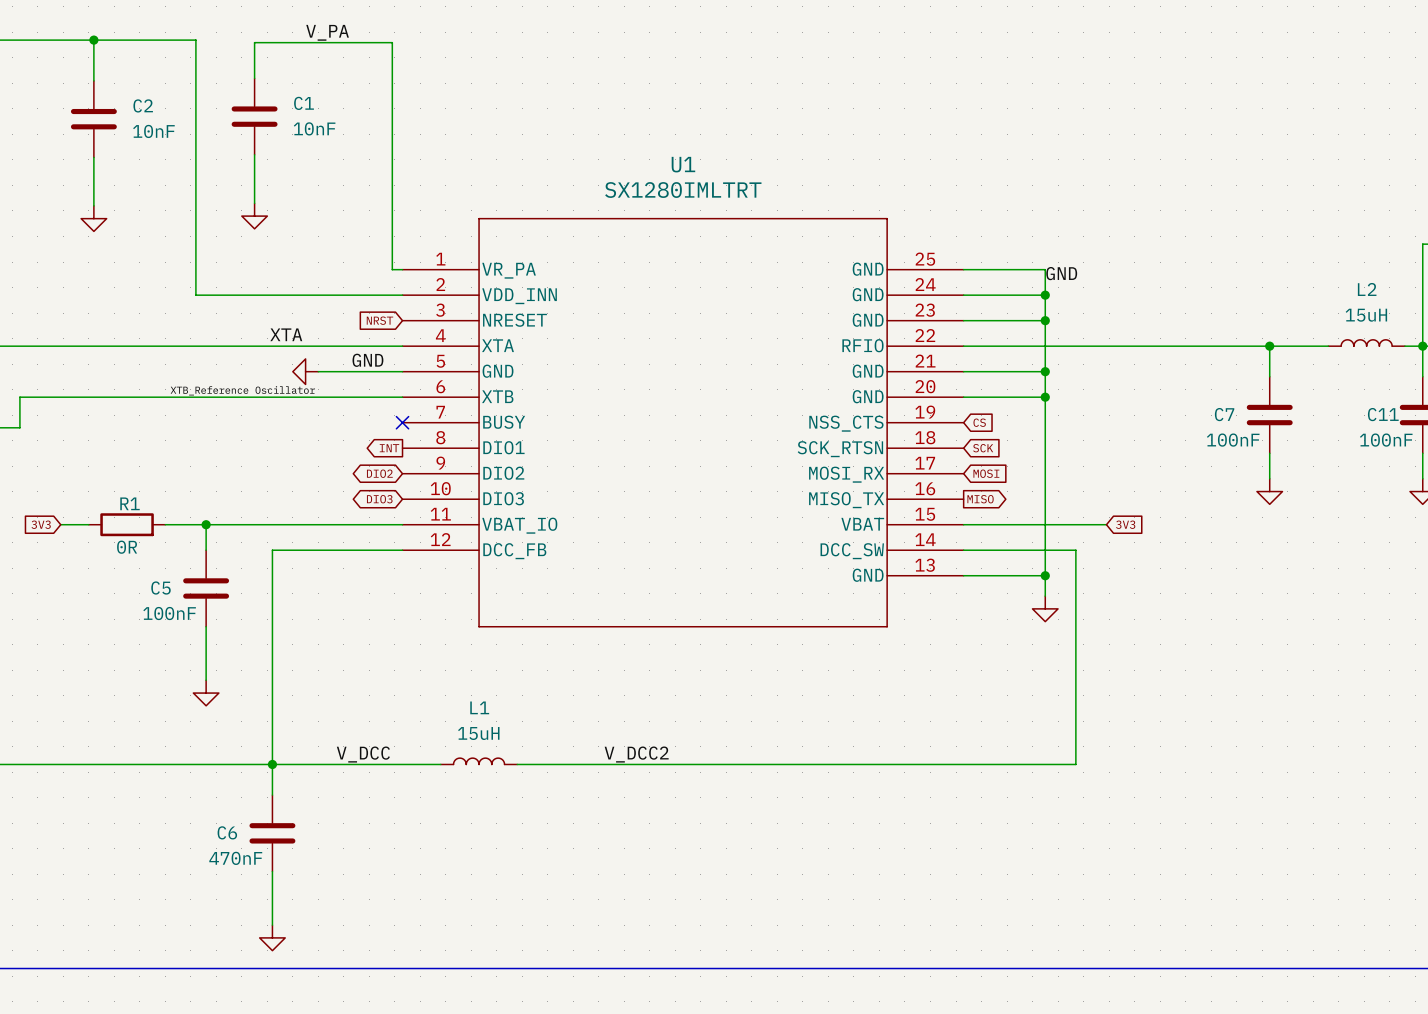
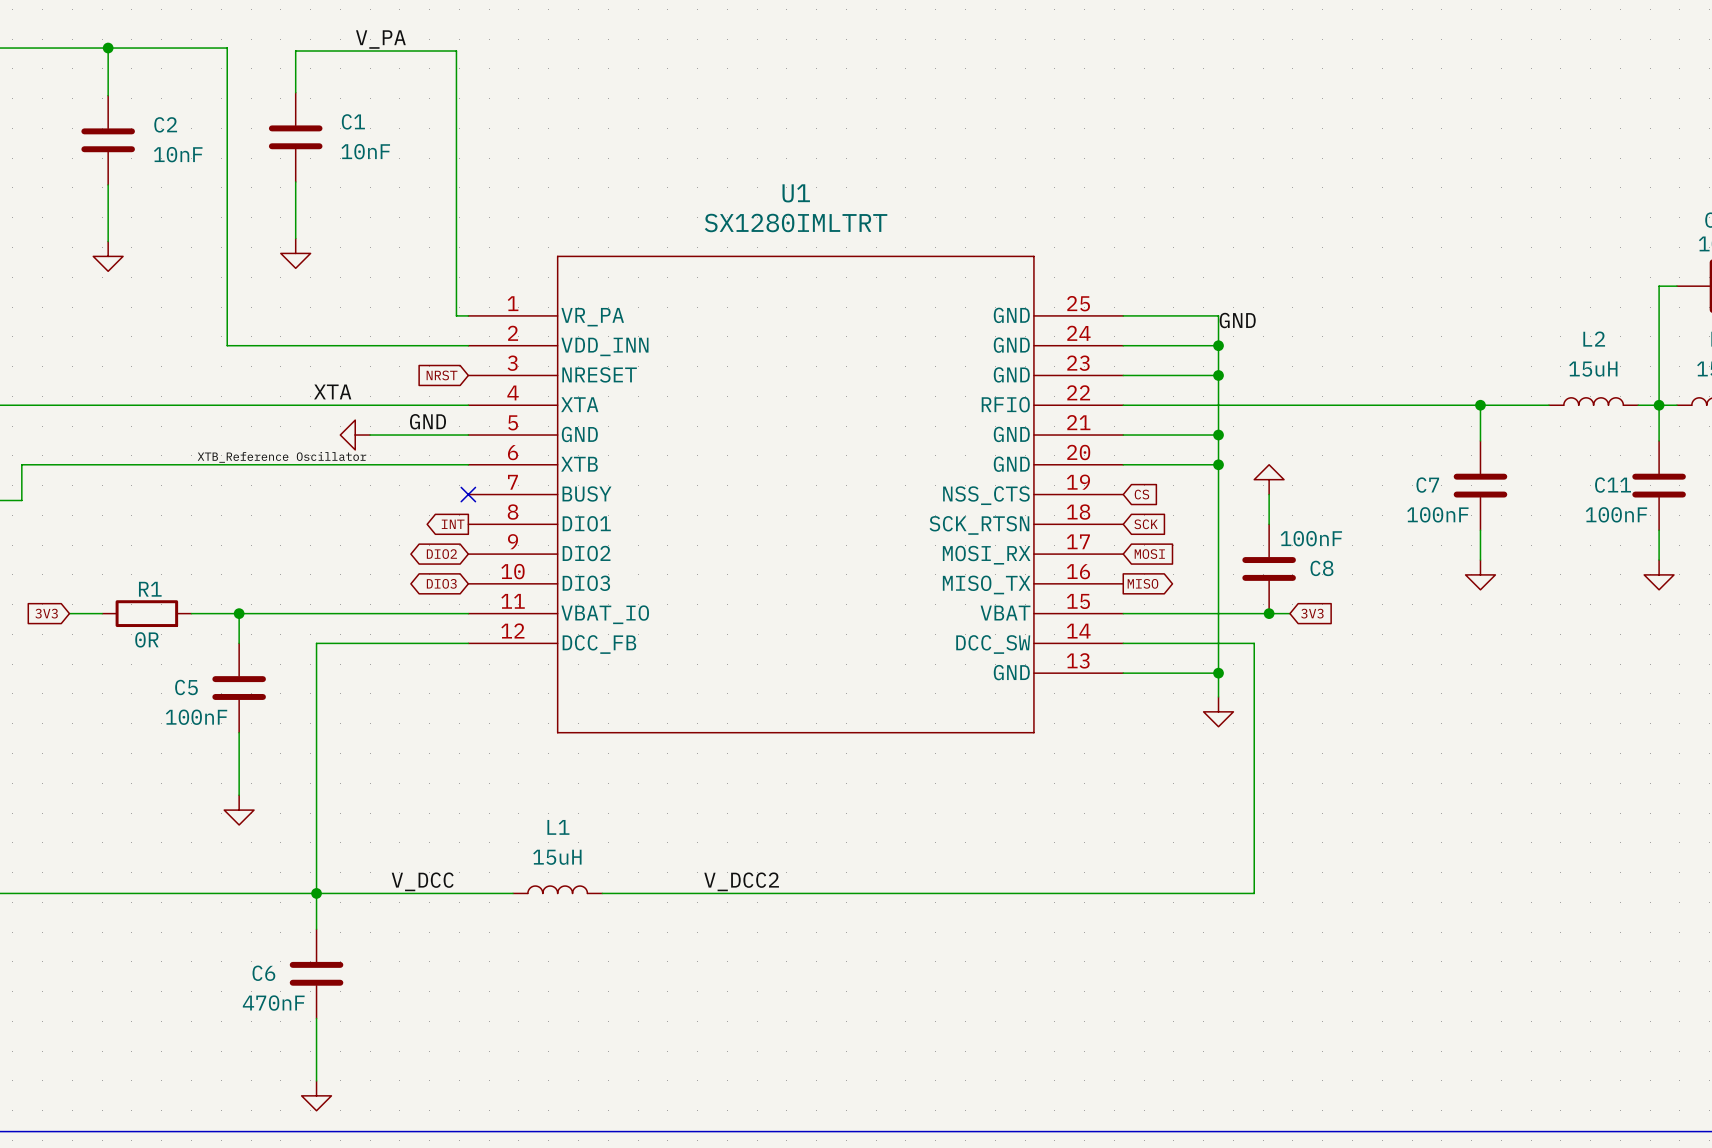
power symbol: none -> (1269, 479)
wire: none -> (1269, 494) (1269, 524)
C8: none -> 100nF (1269, 568)
junction: none -> (1269, 613)

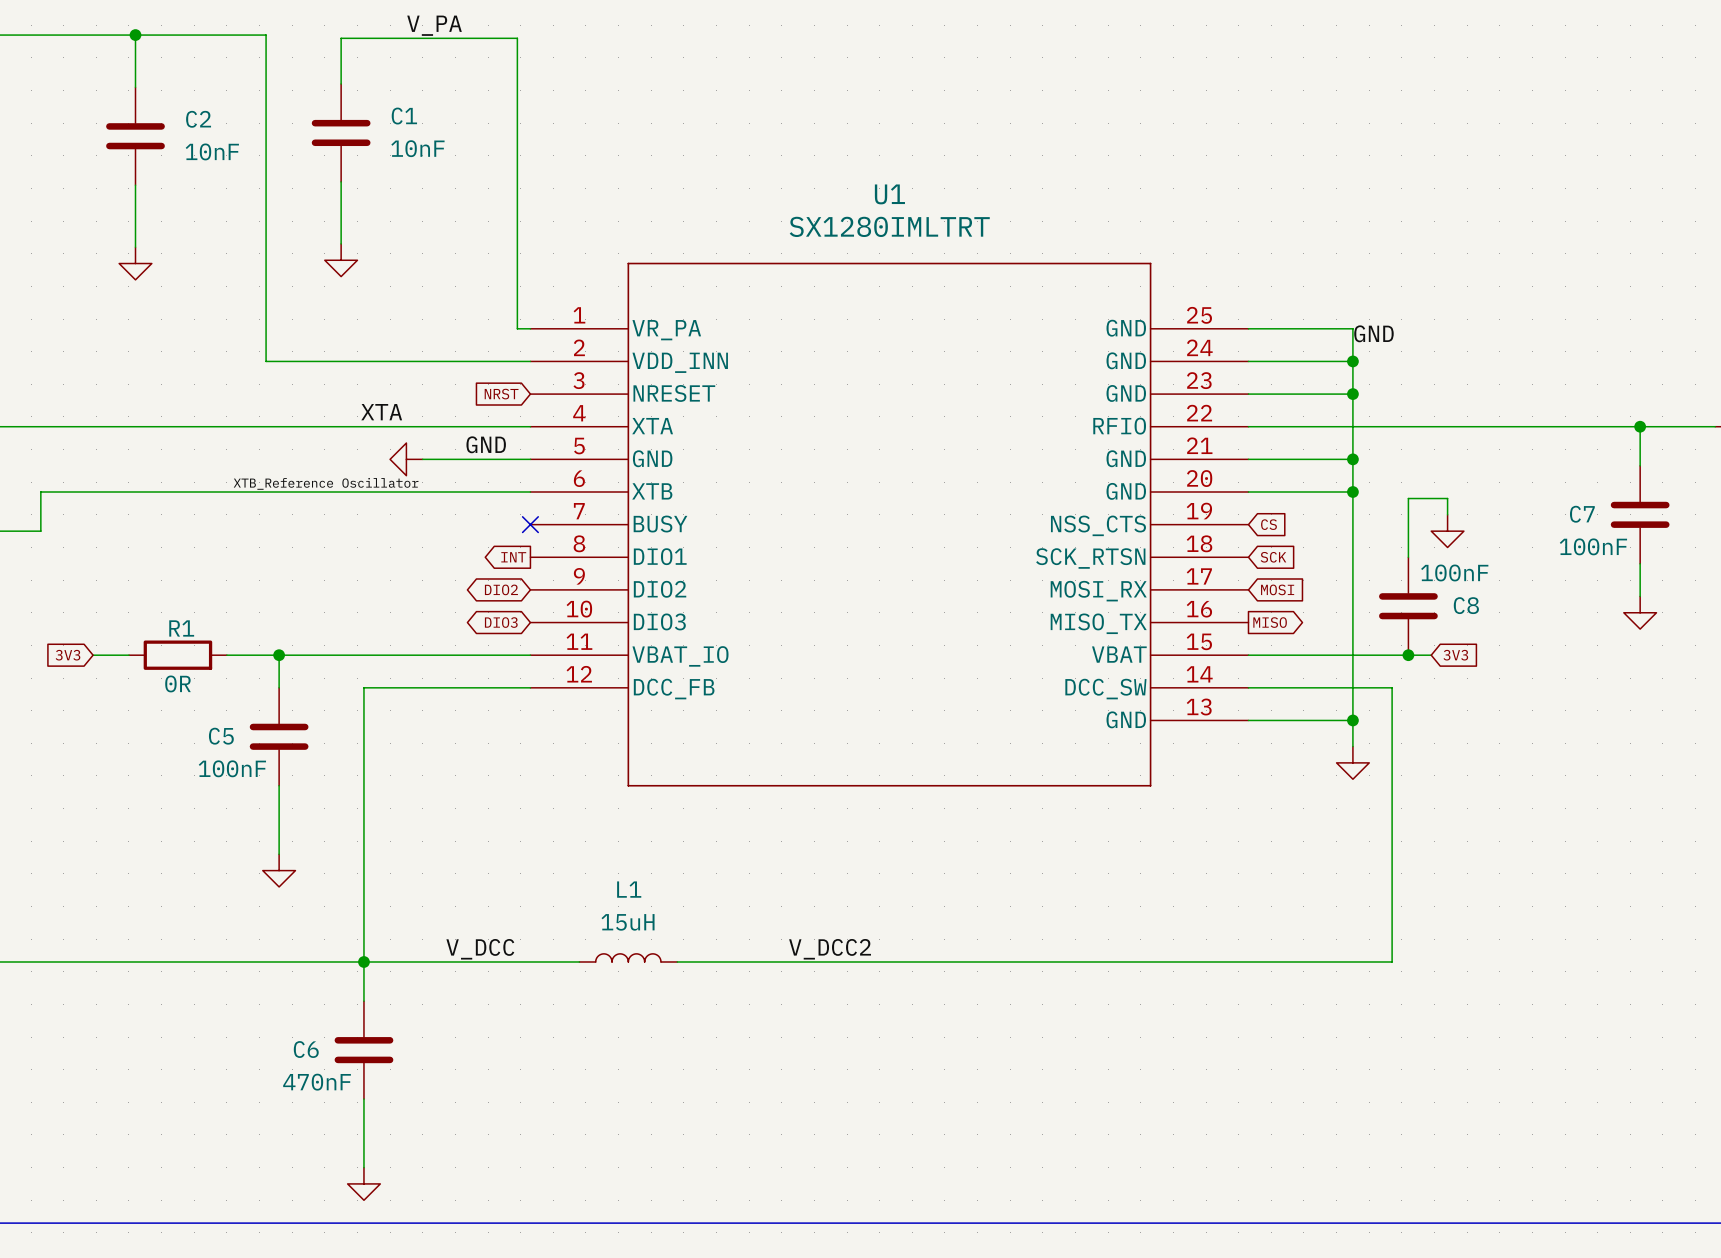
power symbol rotation: 0° (1269, 479) -> 180° (1447, 531)
power symbol position: (1269, 479) -> (1447, 531)
wire: none -> (1447, 514) (1447, 498) (1408, 498) (1408, 524)

